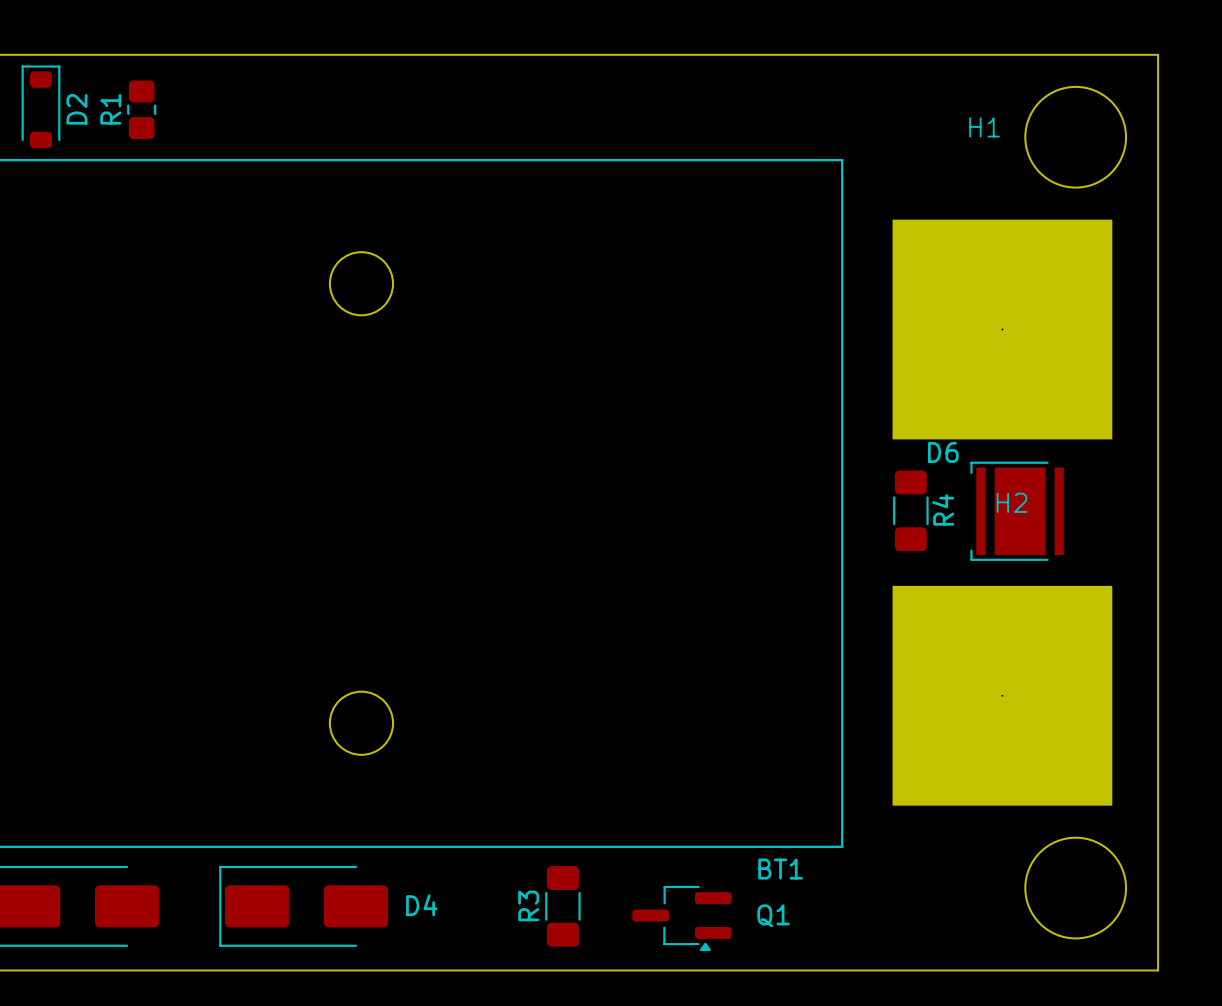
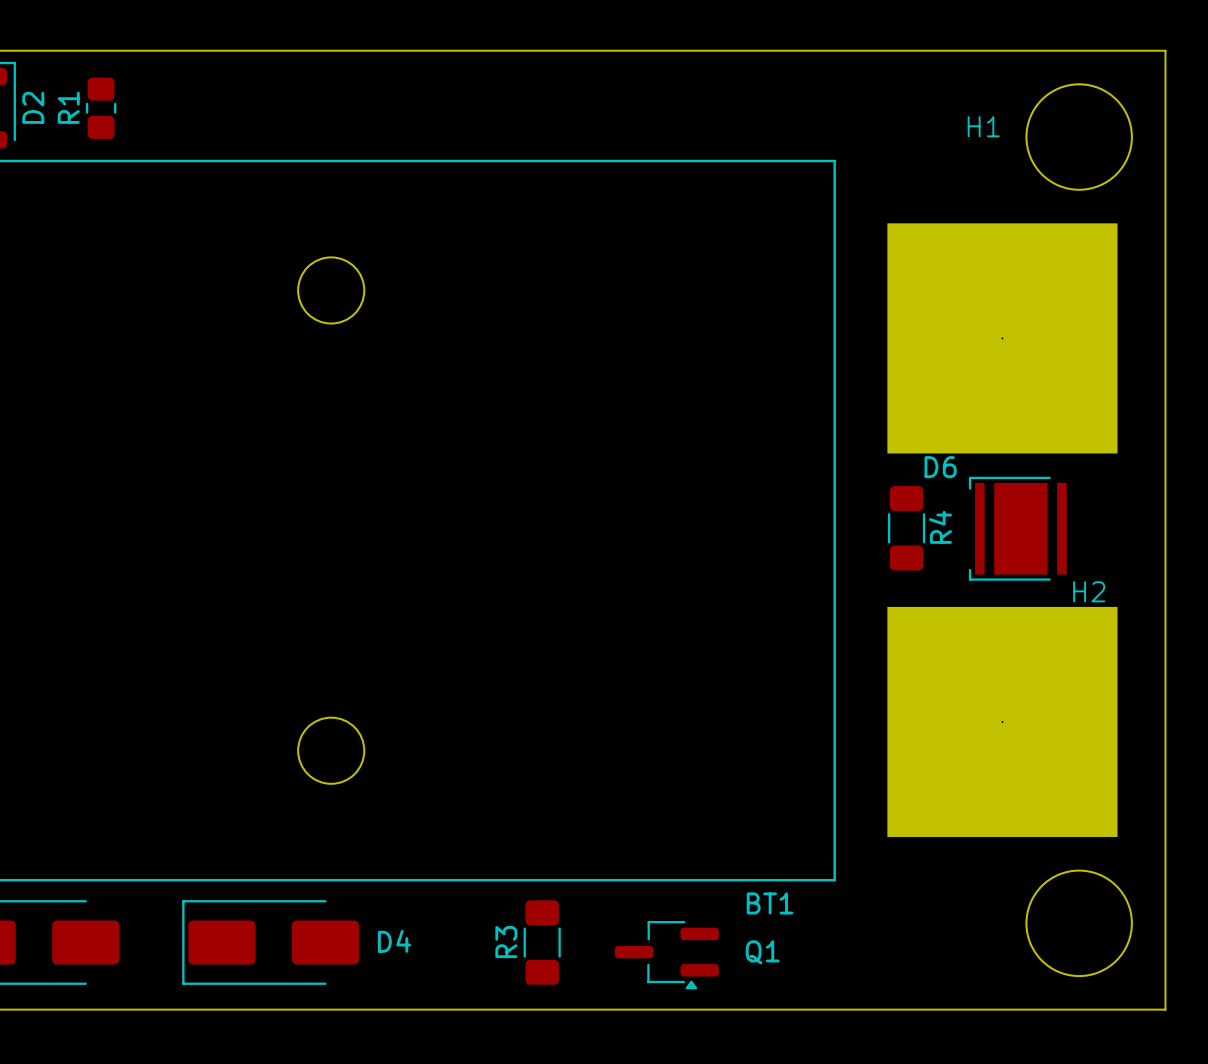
H2 name position: H2 (1012, 502) -> H2 (1089, 591)

